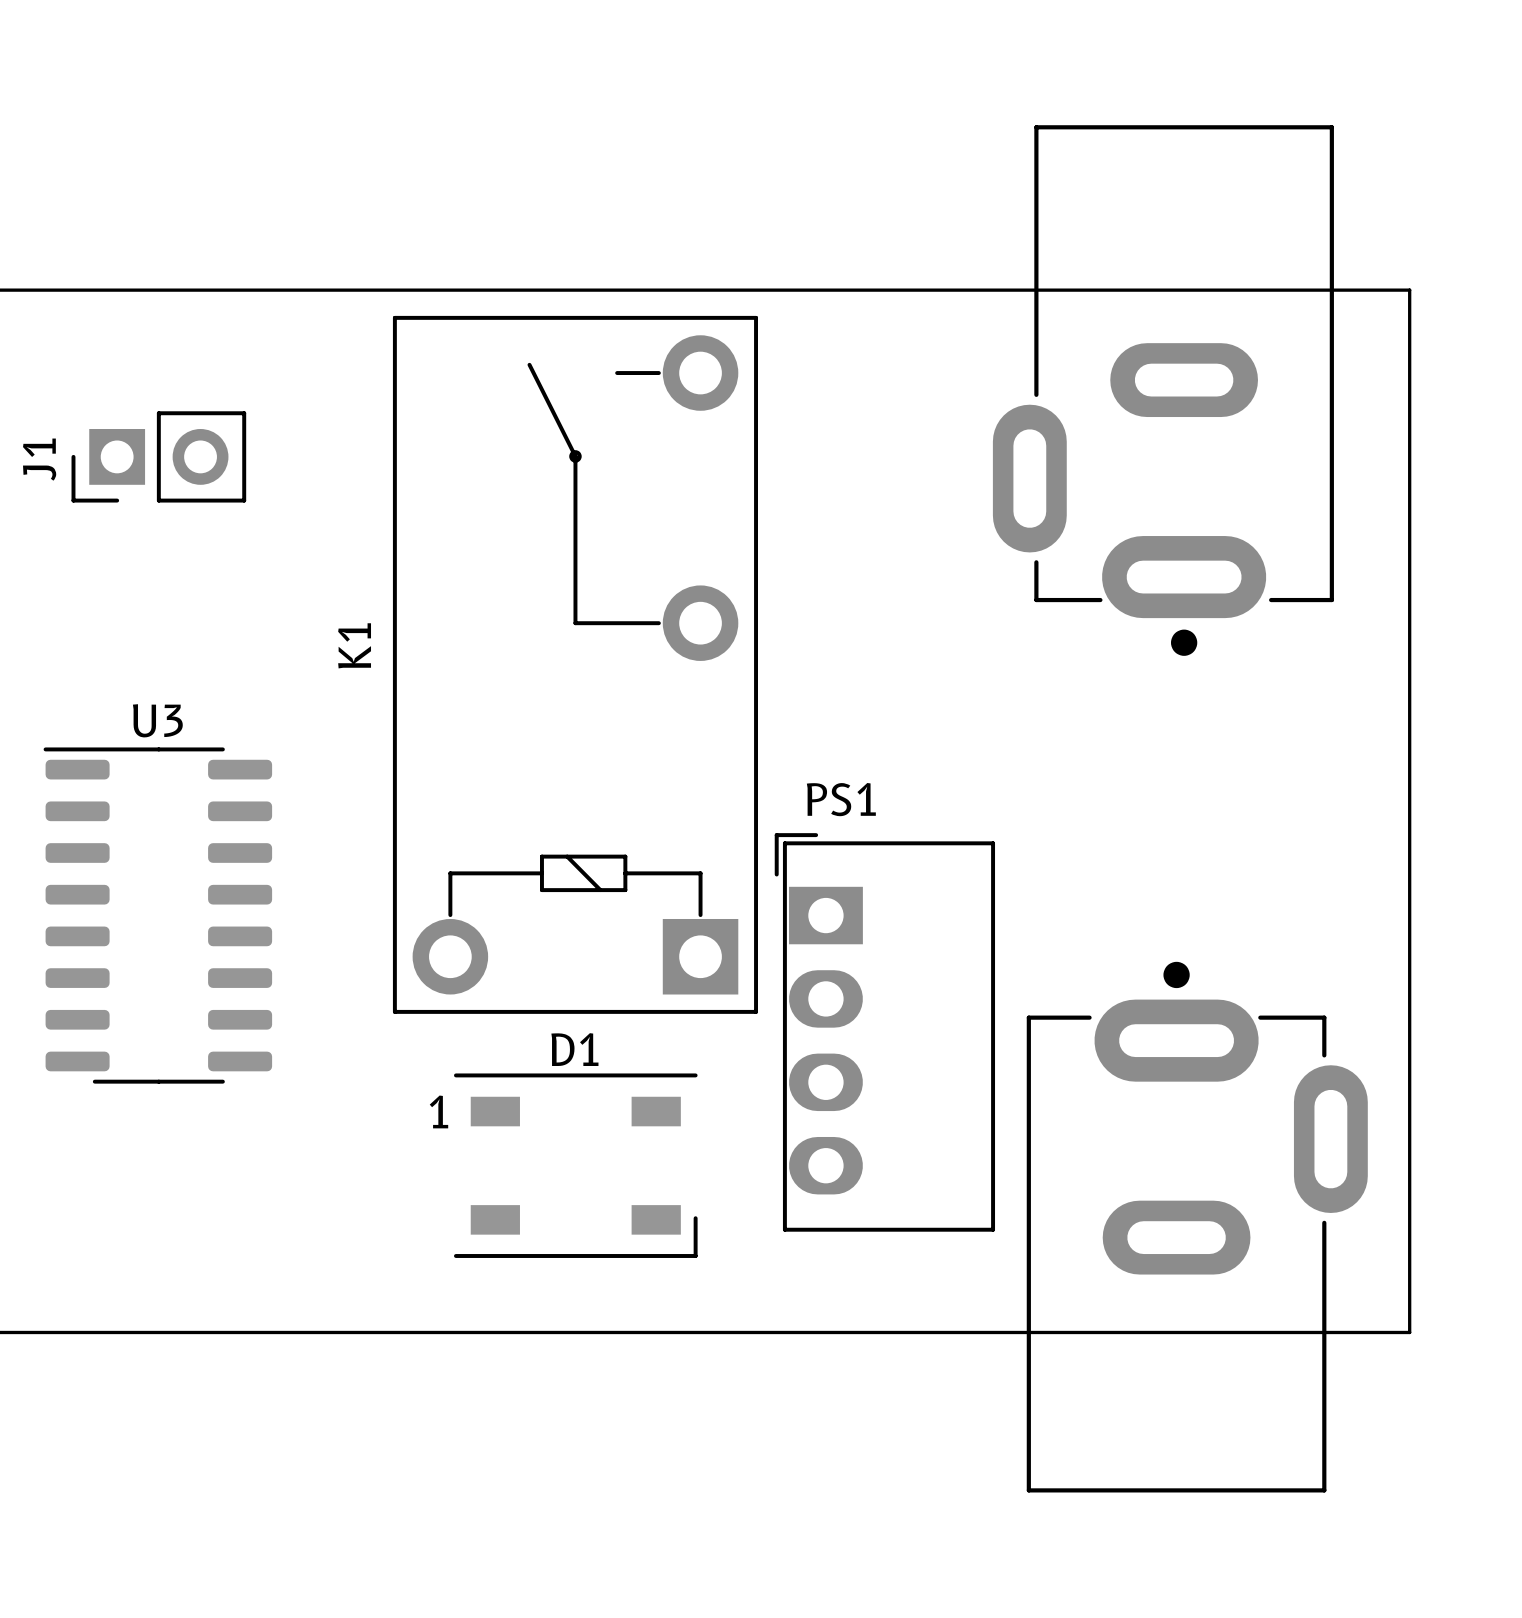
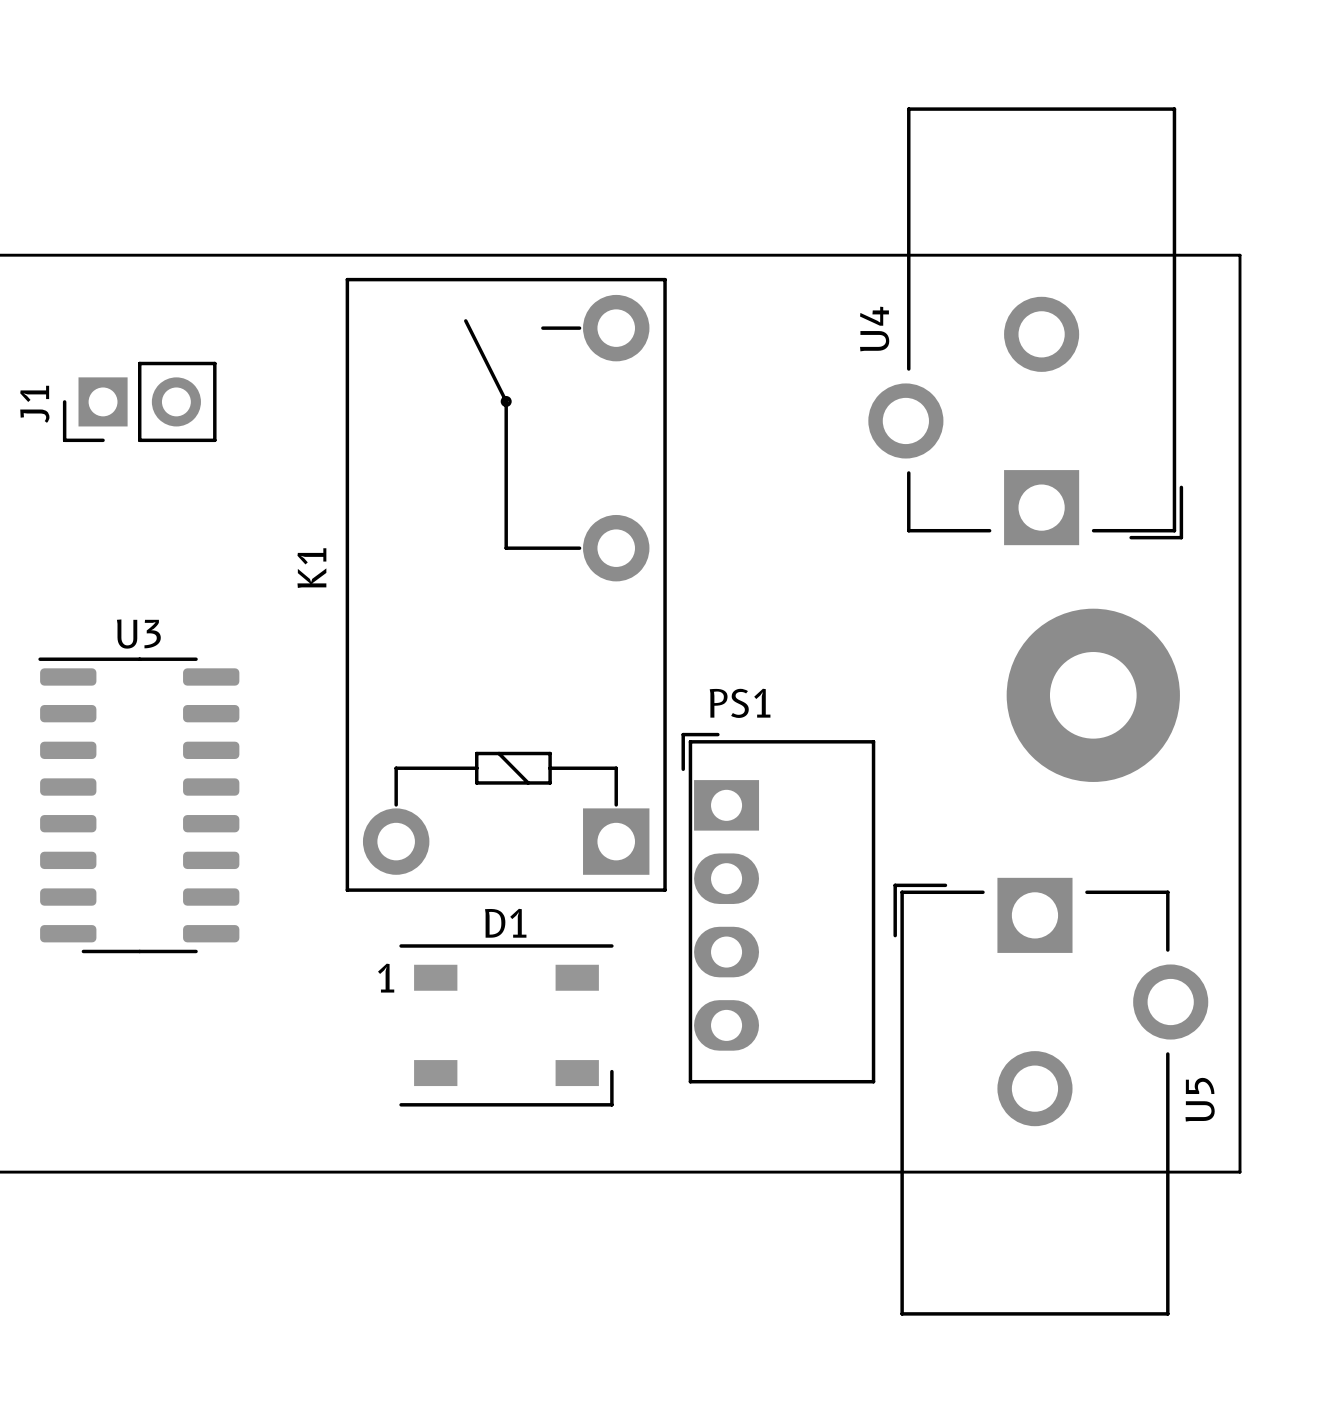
U4: none -> (1025, 326)
part: (1163, 390) -> none
part: none -> (1093, 695)
part: (1197, 1227) -> none
U5: none -> (1050, 1096)

